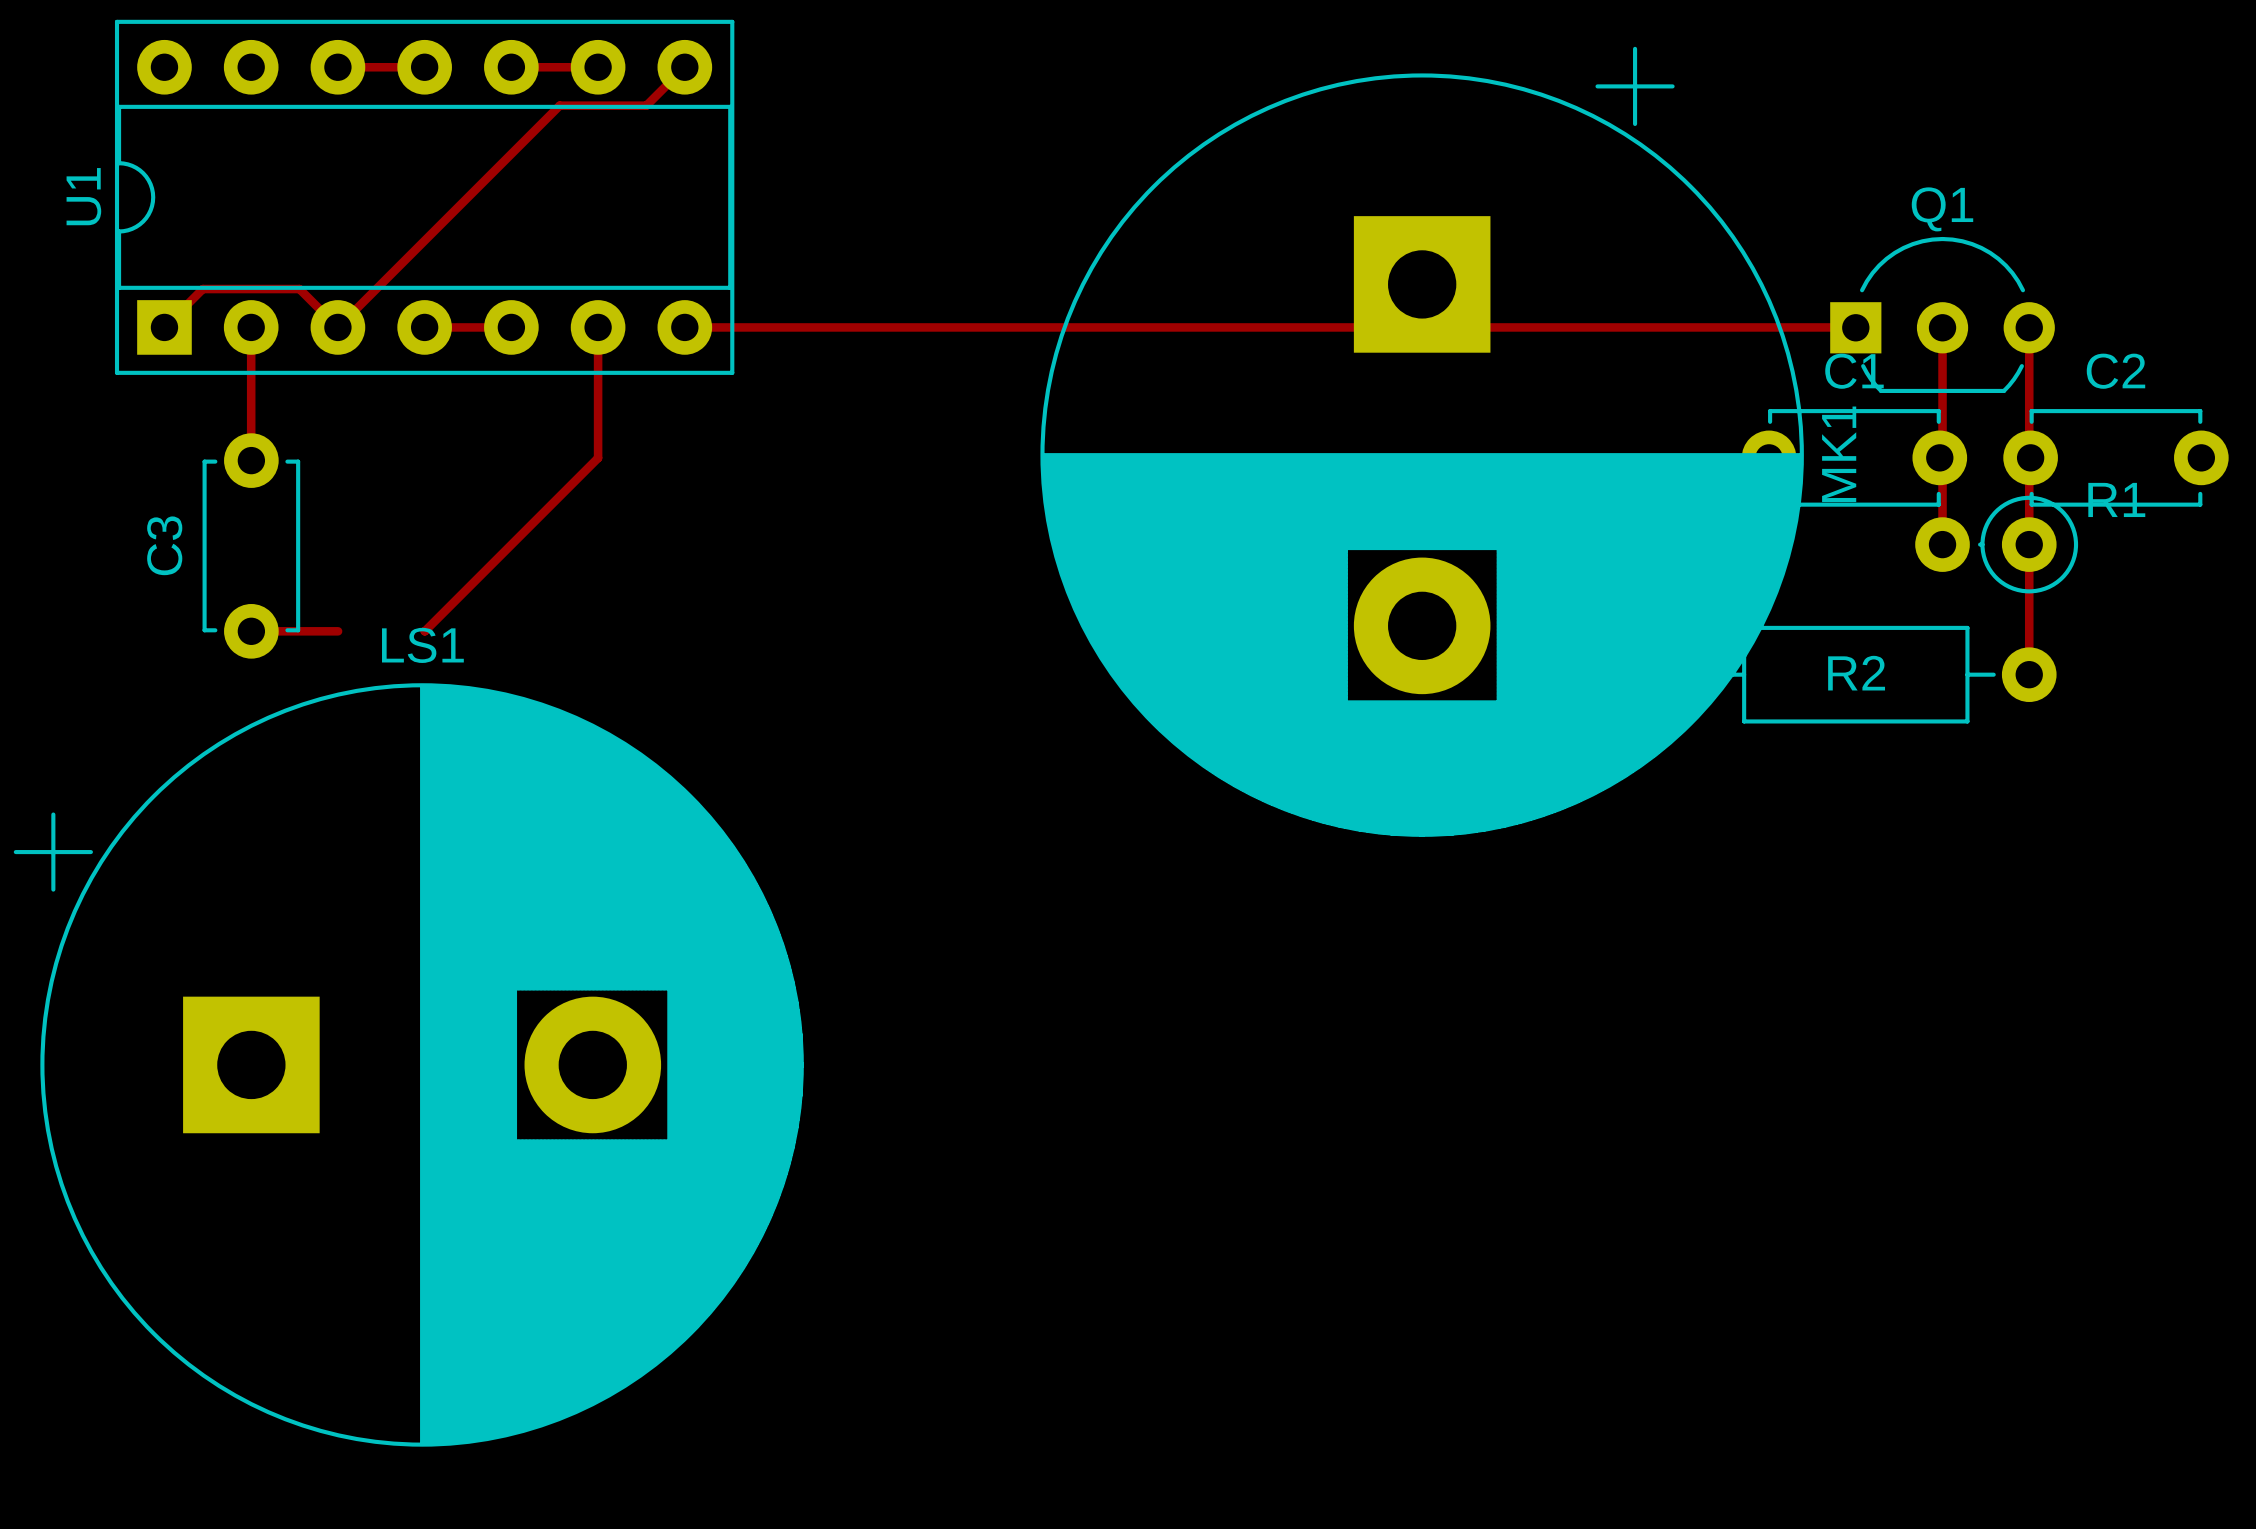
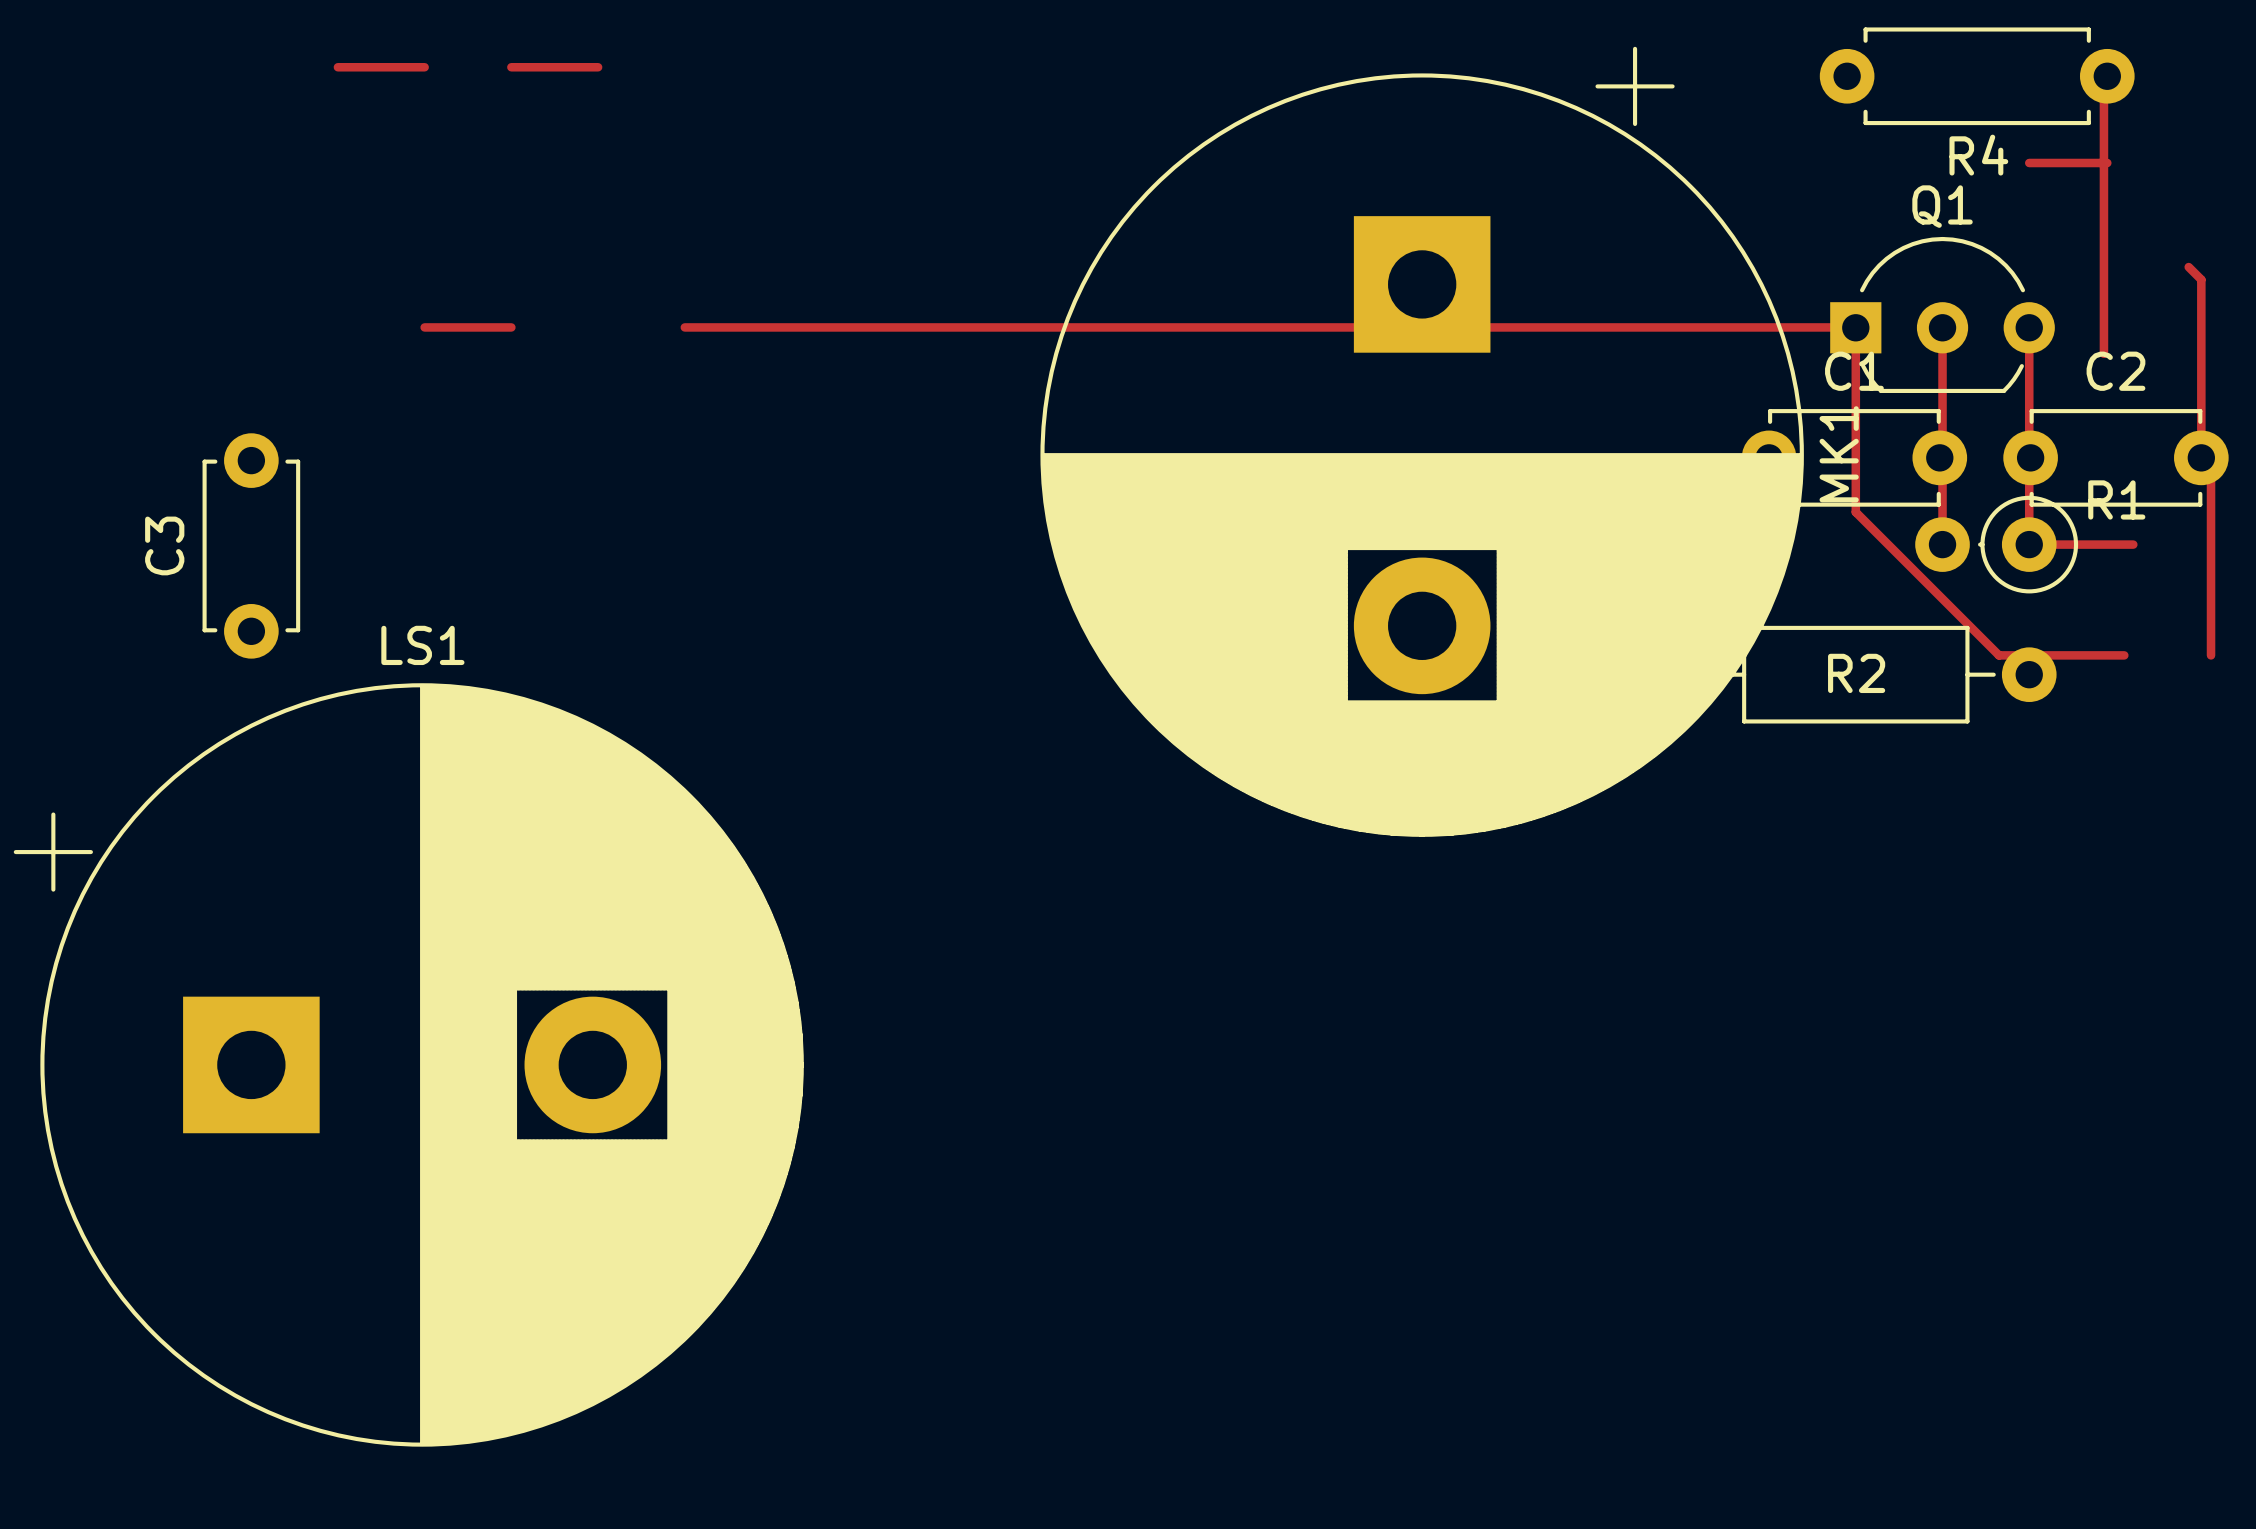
track: (684, 67) (646, 105) (559, 105) (337, 327) (299, 289) (202, 289) (164, 327) -> none
track: none -> (2094, 67) (2103, 77) (2103, 353)
R4: none -> (1977, 76)
track: none -> (2029, 163) (2107, 163)
U1: (424, 197) -> none
track: none -> (2188, 267) (2201, 279) (2201, 457) (2211, 467) (2211, 655)
track: (251, 327) (251, 460) -> none
track: (598, 327) (598, 458) (424, 631) -> none
track: none -> (1855, 327) (1855, 512) (1999, 655) (2124, 655)
track: (2029, 544) (2029, 674) -> (2029, 544) (2133, 544)
track: (251, 631) (338, 631) -> none

